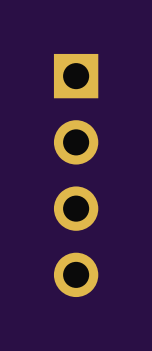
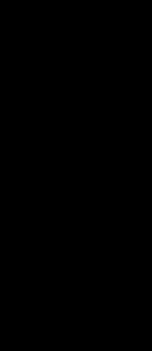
part: (76, 175) -> none

